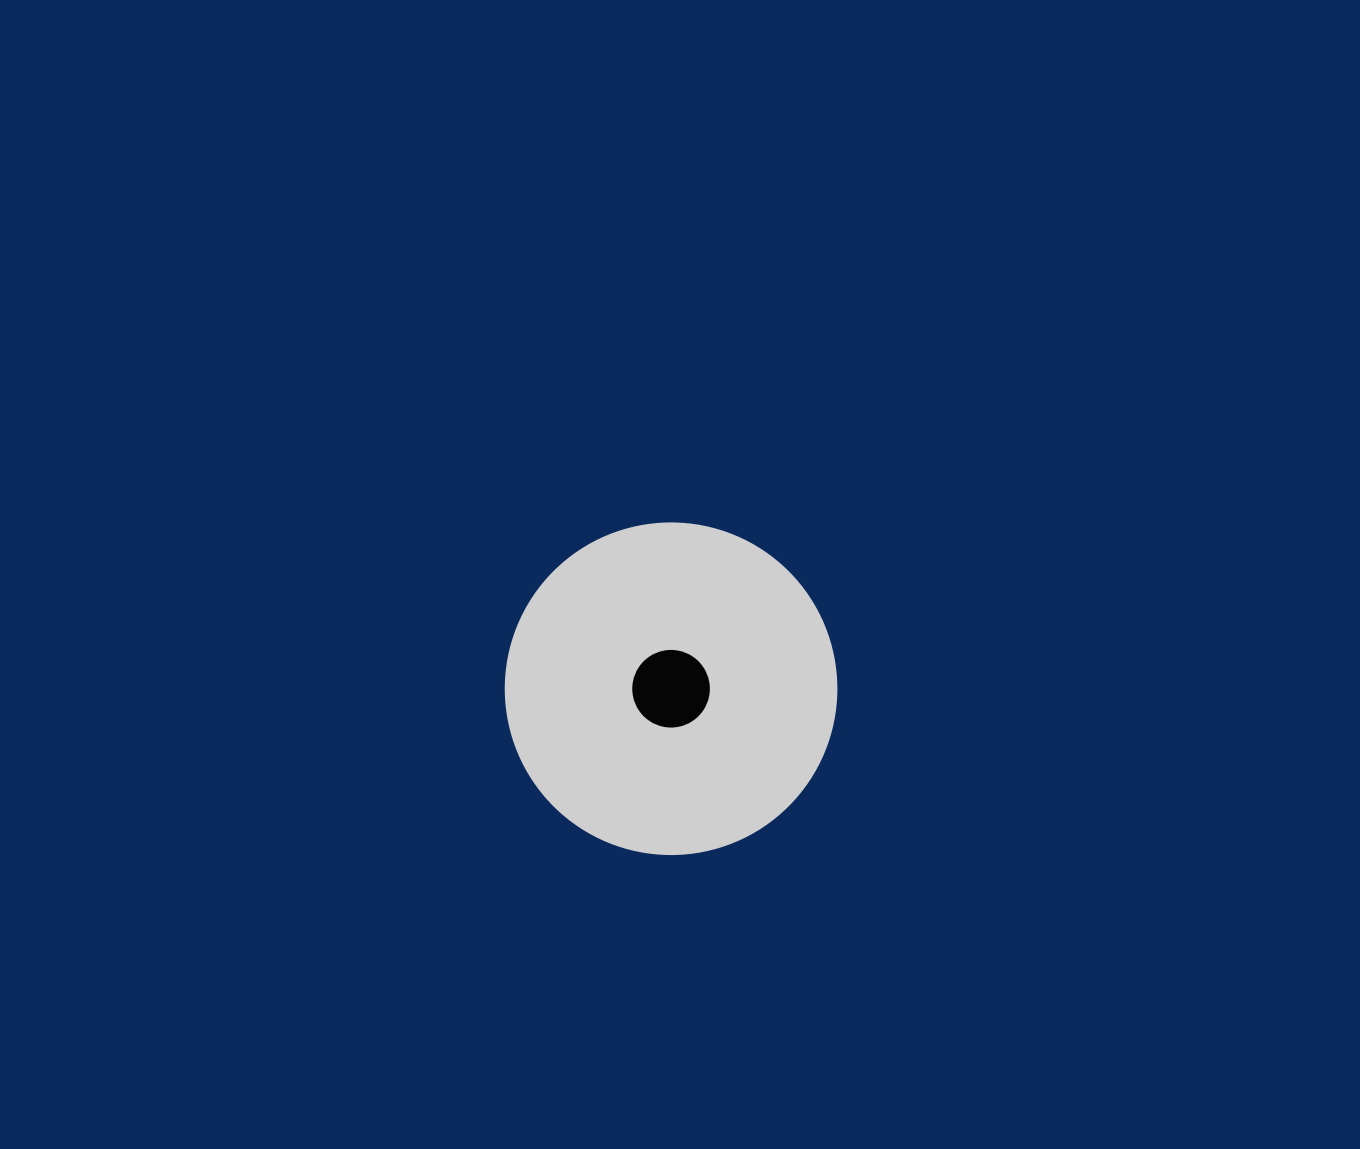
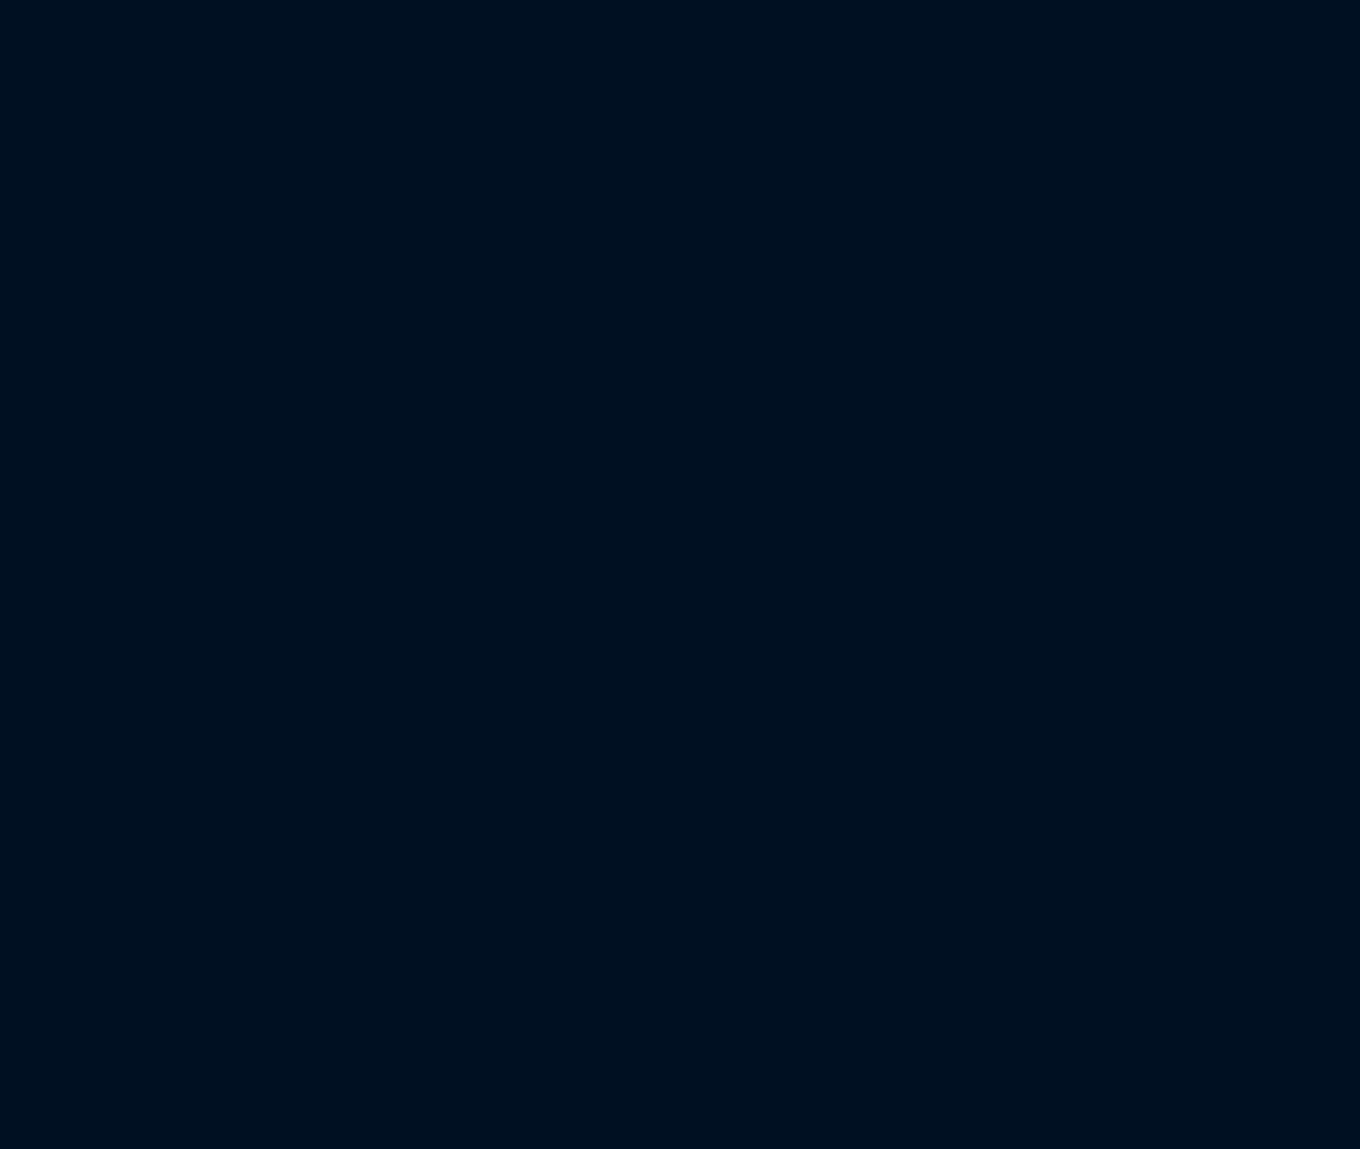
part: (671, 688) -> none

